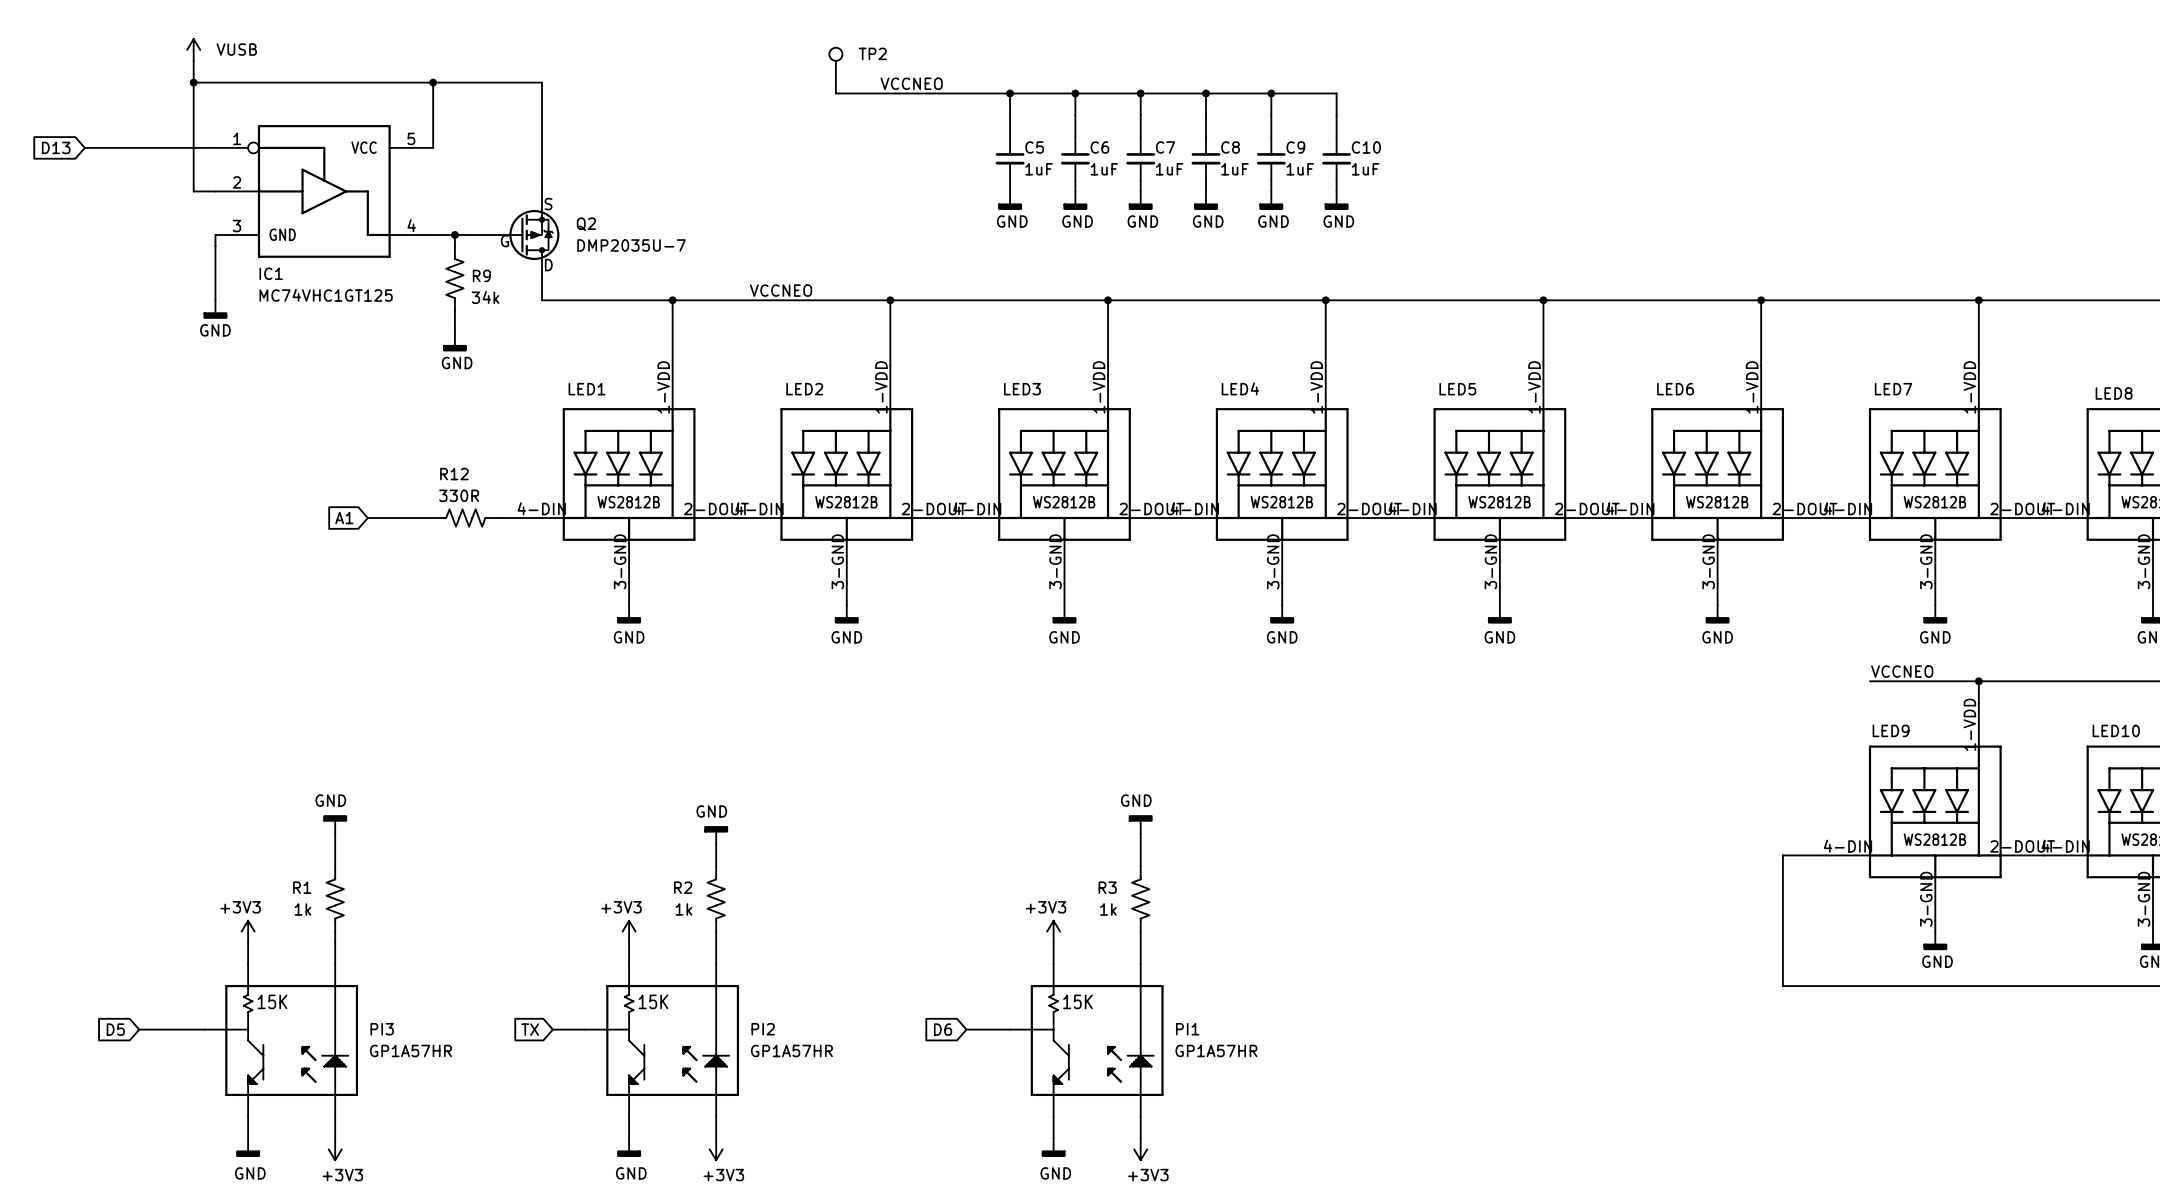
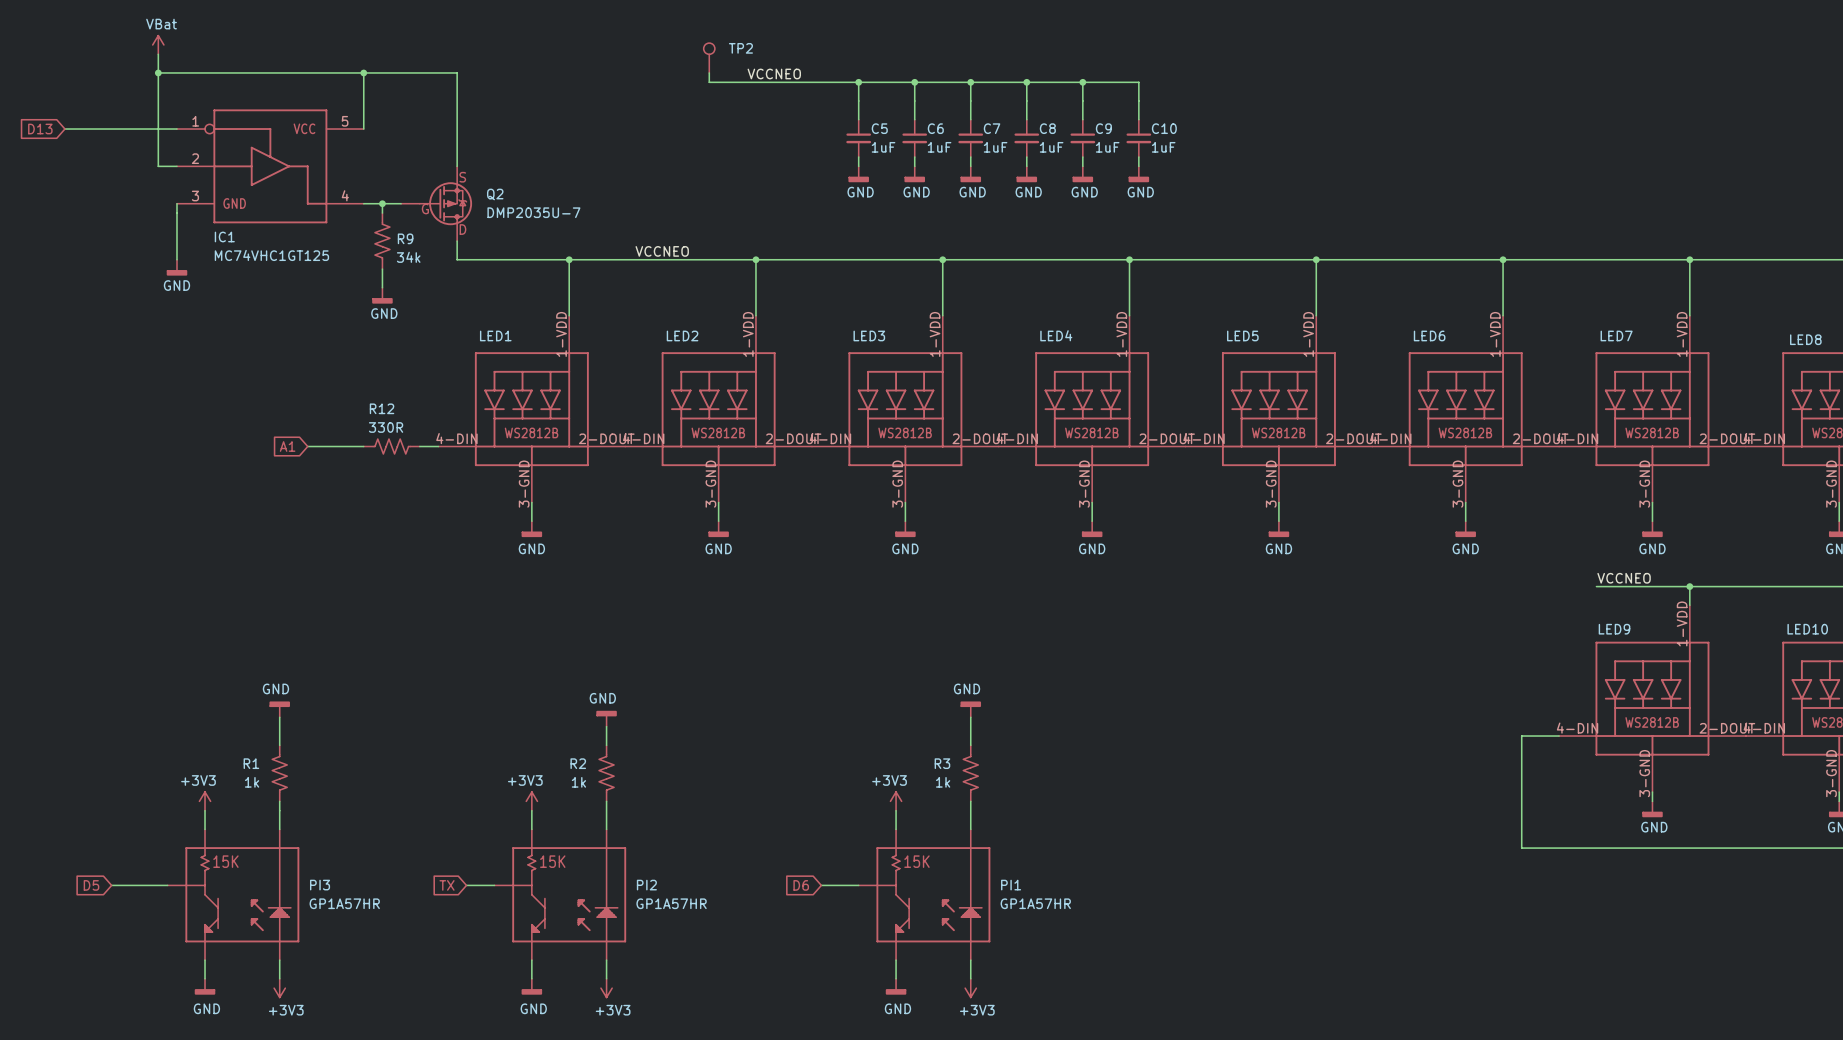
power symbol: VUSB (193, 49) -> VBat (158, 44)

